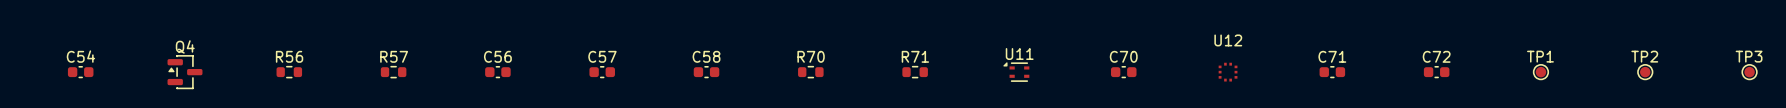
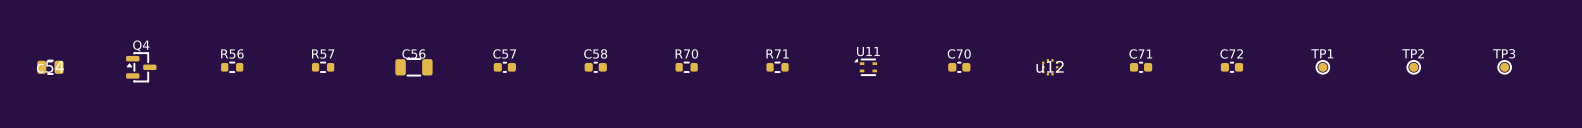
U12 name: U12 (1228, 40) -> none
C56 footprint: [485, 66, 511, 79] -> [395, 58, 433, 77]
U12 text: none -> u12 (1050, 66)
C54: (80, 72) -> none
part: none -> (50, 67)

